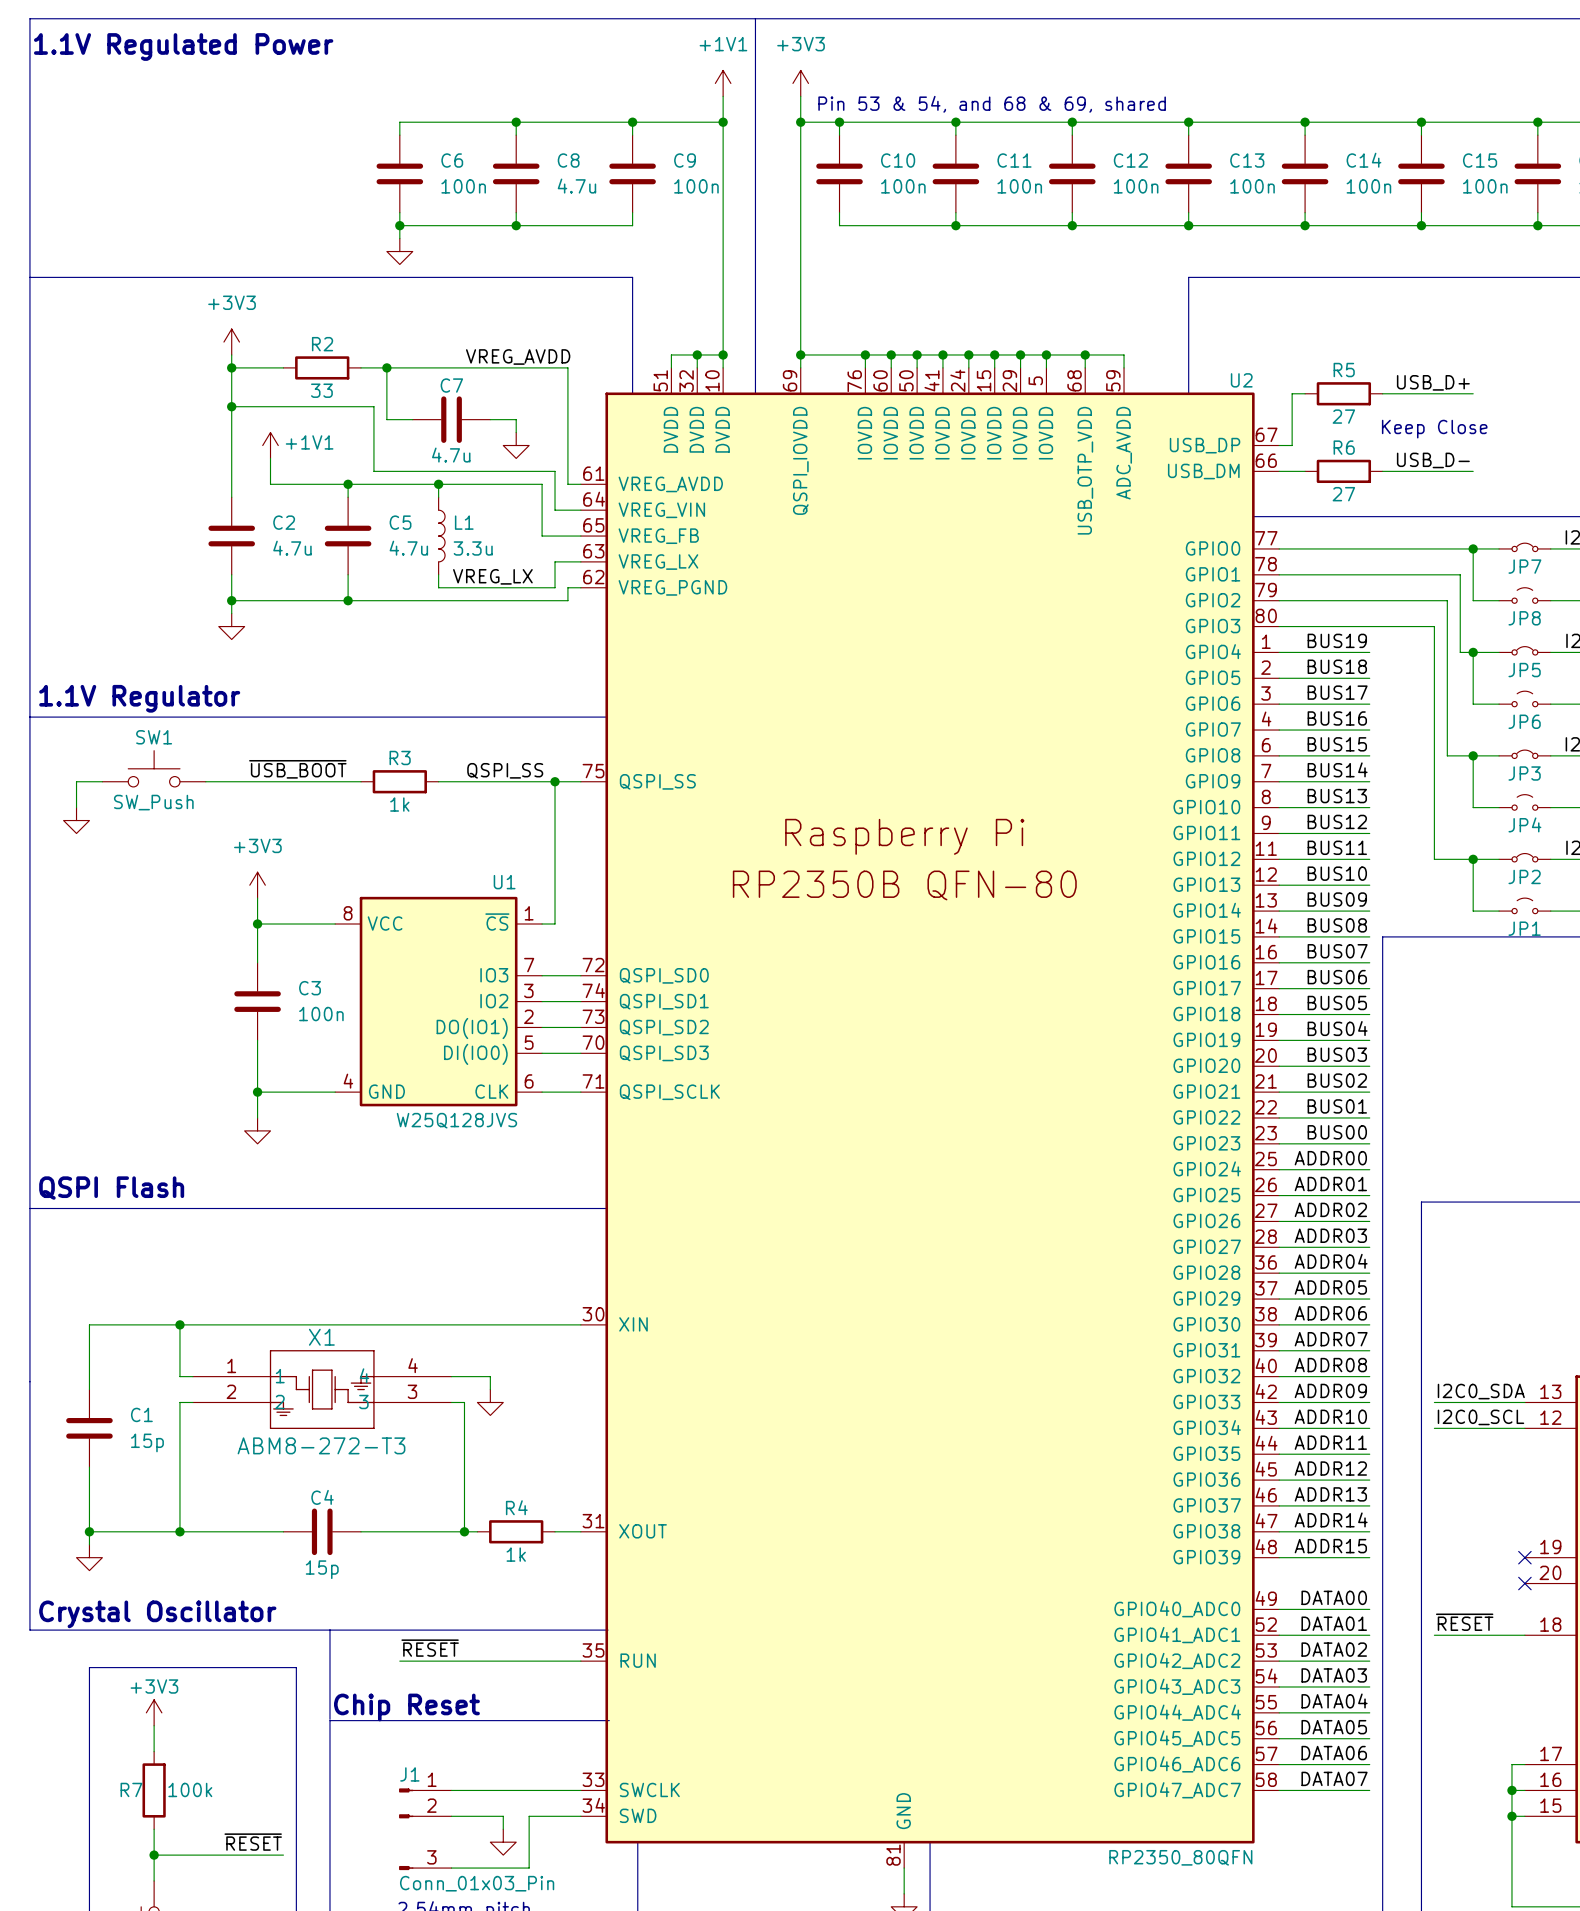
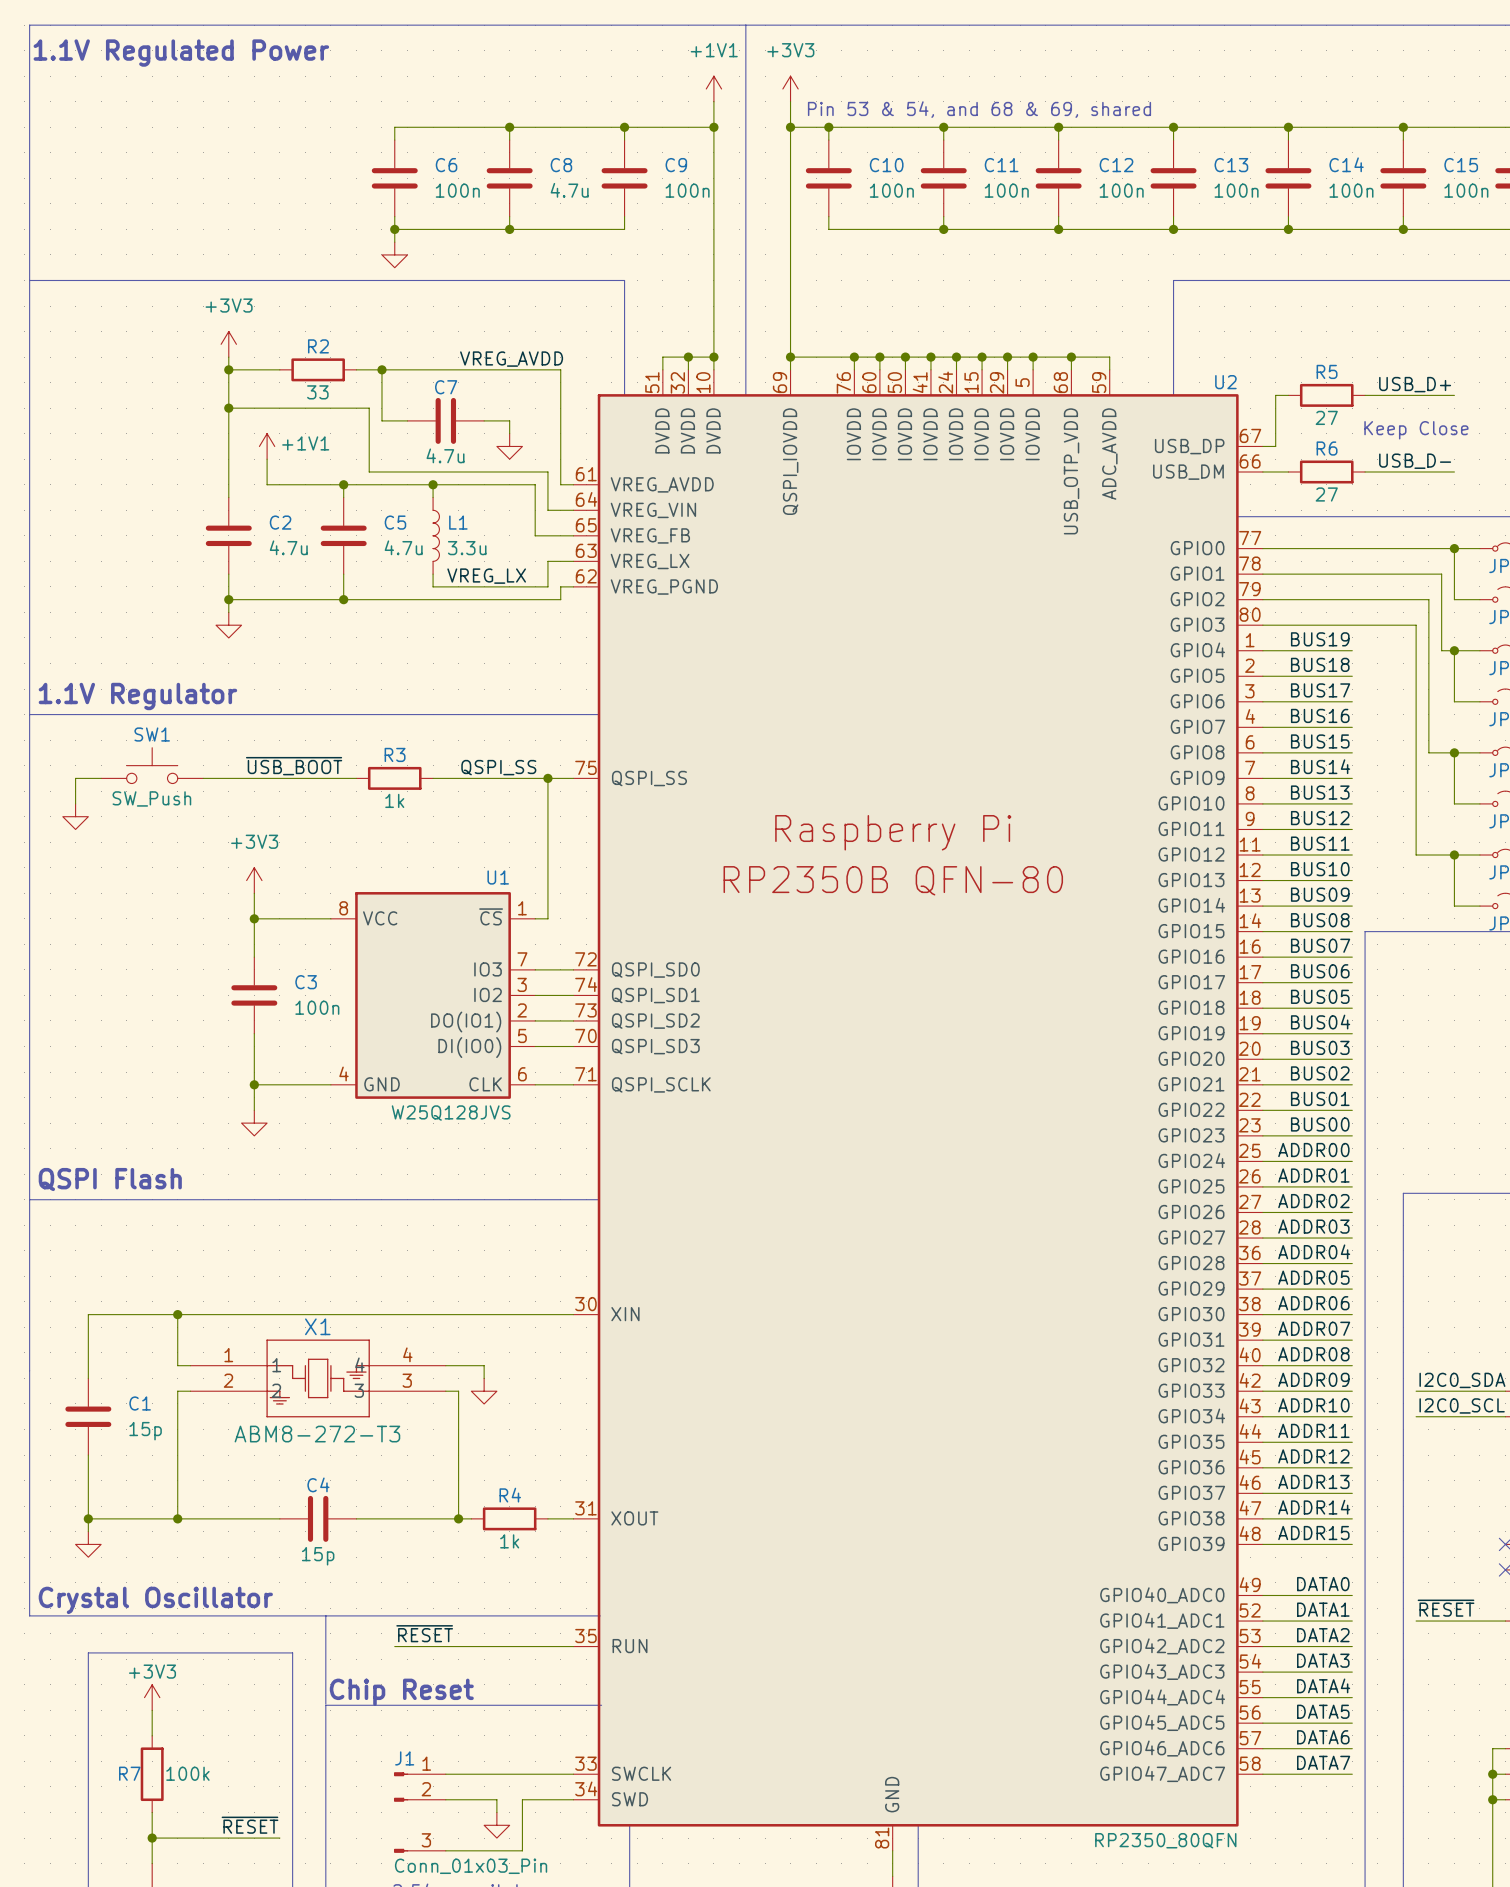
label: DATA00 (1334, 1597) -> DATA0 (1323, 1584)
label: DATA01 (1334, 1623) -> DATA1 (1323, 1609)
label: DATA02 (1334, 1649) -> DATA2 (1323, 1635)
label: DATA03 (1334, 1675) -> DATA3 (1323, 1660)
label: DATA04 (1334, 1701) -> DATA4 (1323, 1685)
label: DATA05 (1334, 1727) -> DATA5 (1323, 1711)
label: DATA06 (1334, 1753) -> DATA6 (1323, 1737)
label: DATA07 (1334, 1778) -> DATA7 (1323, 1762)

